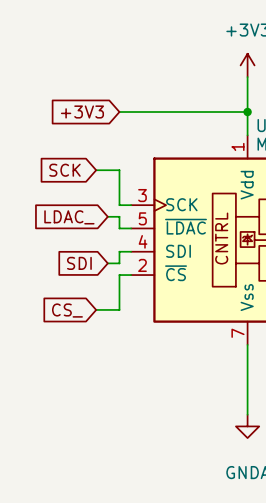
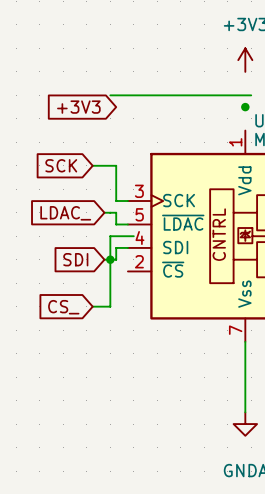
wire: (247, 77) (247, 135) -> none
wire: none -> (110, 95) (251, 95)
wire: (119, 112) (247, 112) -> none
junction: none -> (110, 259)
wire: (131, 275) (119, 275) (119, 309) (113, 309) -> (133, 236) (110, 236) (110, 306)

